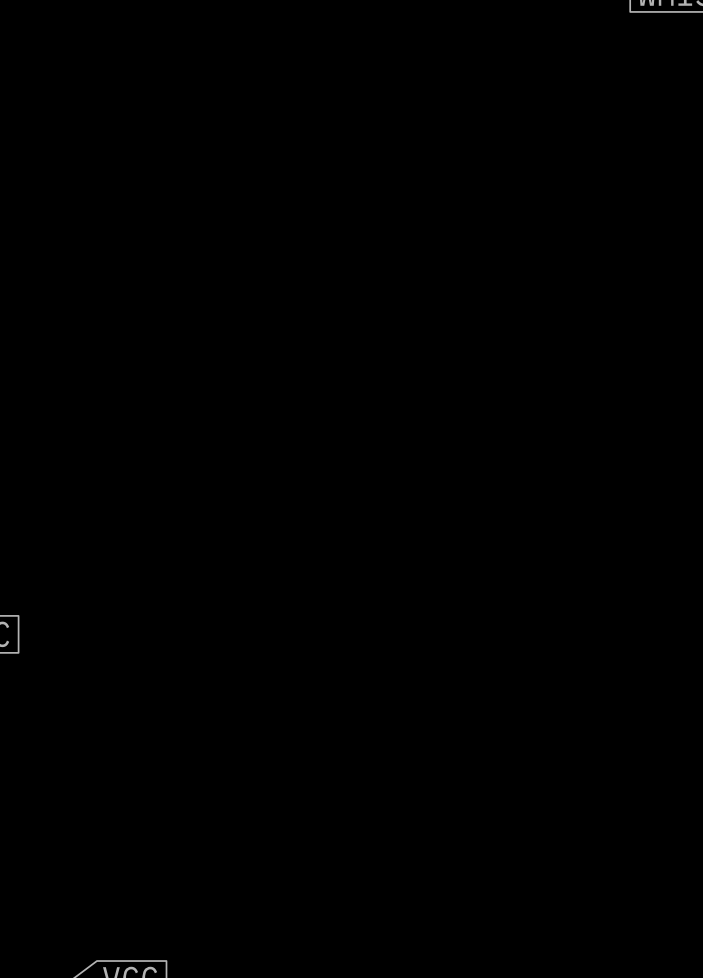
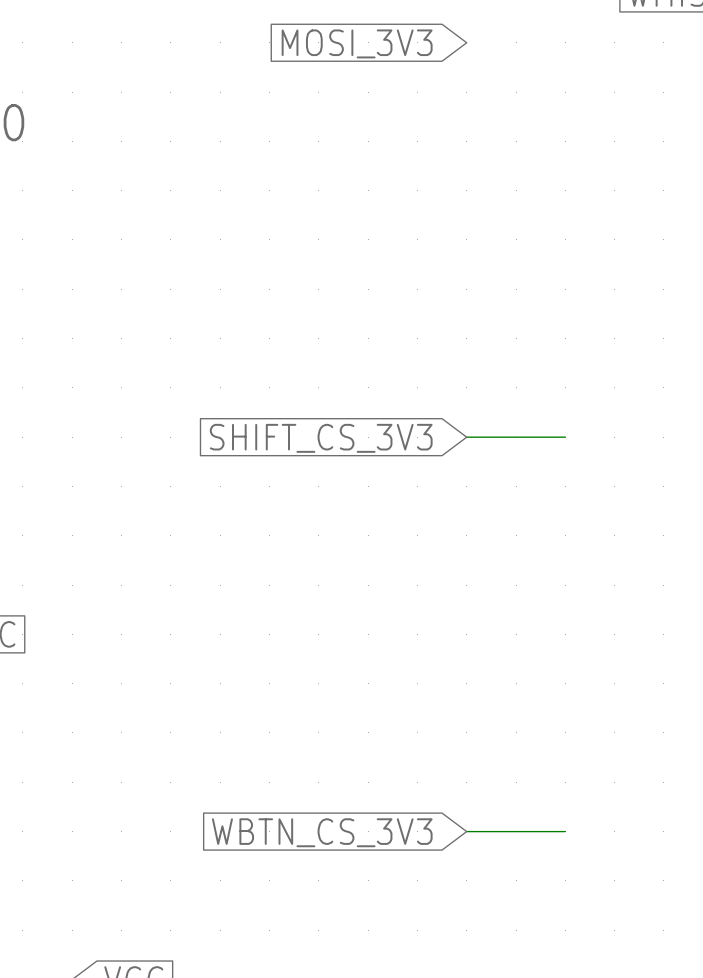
global label: none -> MOSI_3V3 (357, 43)
wire: none -> (466, 437) (565, 437)
global label: none -> SHIFT_CS_3V3 (321, 438)
wire: none -> (466, 831) (565, 831)
global label: none -> WBTN_CS_3V3 (322, 832)

